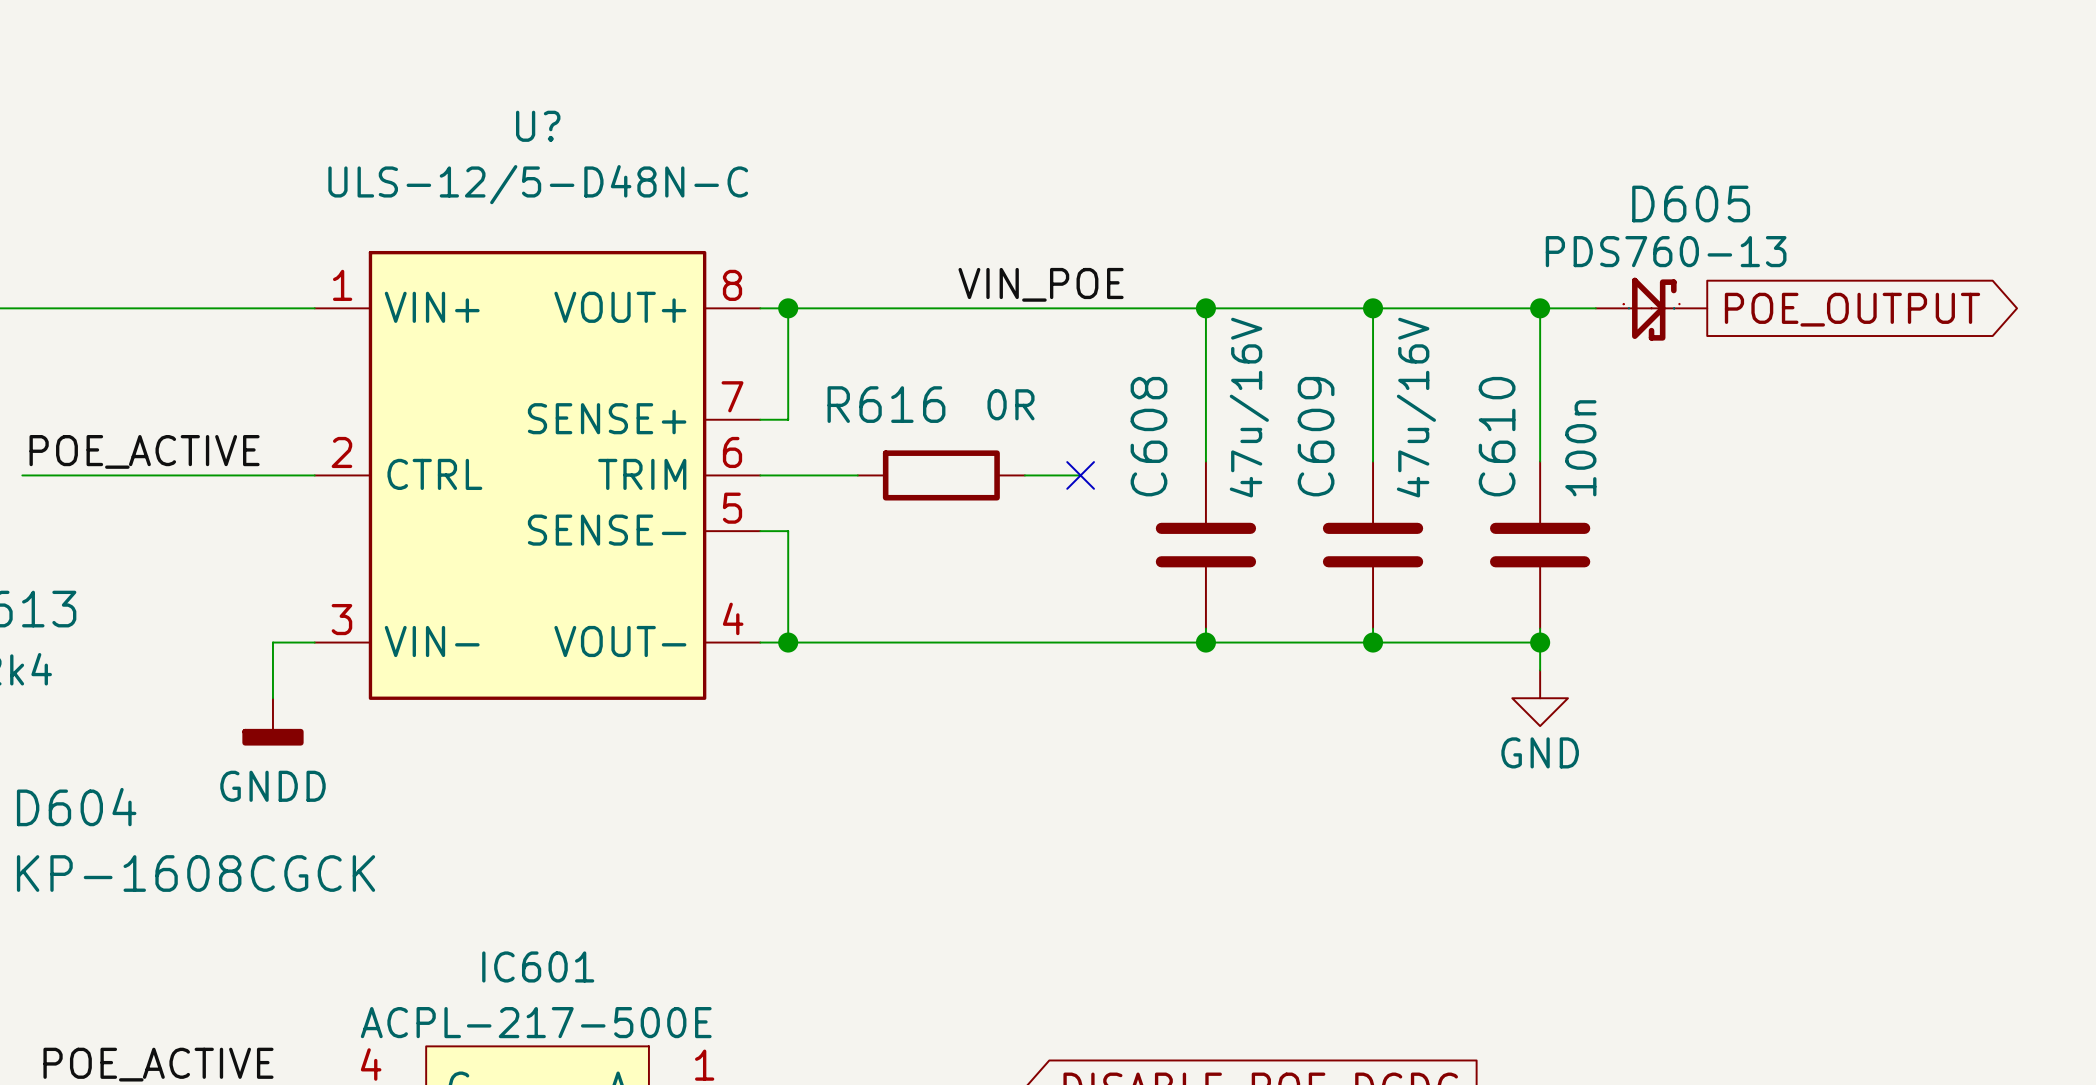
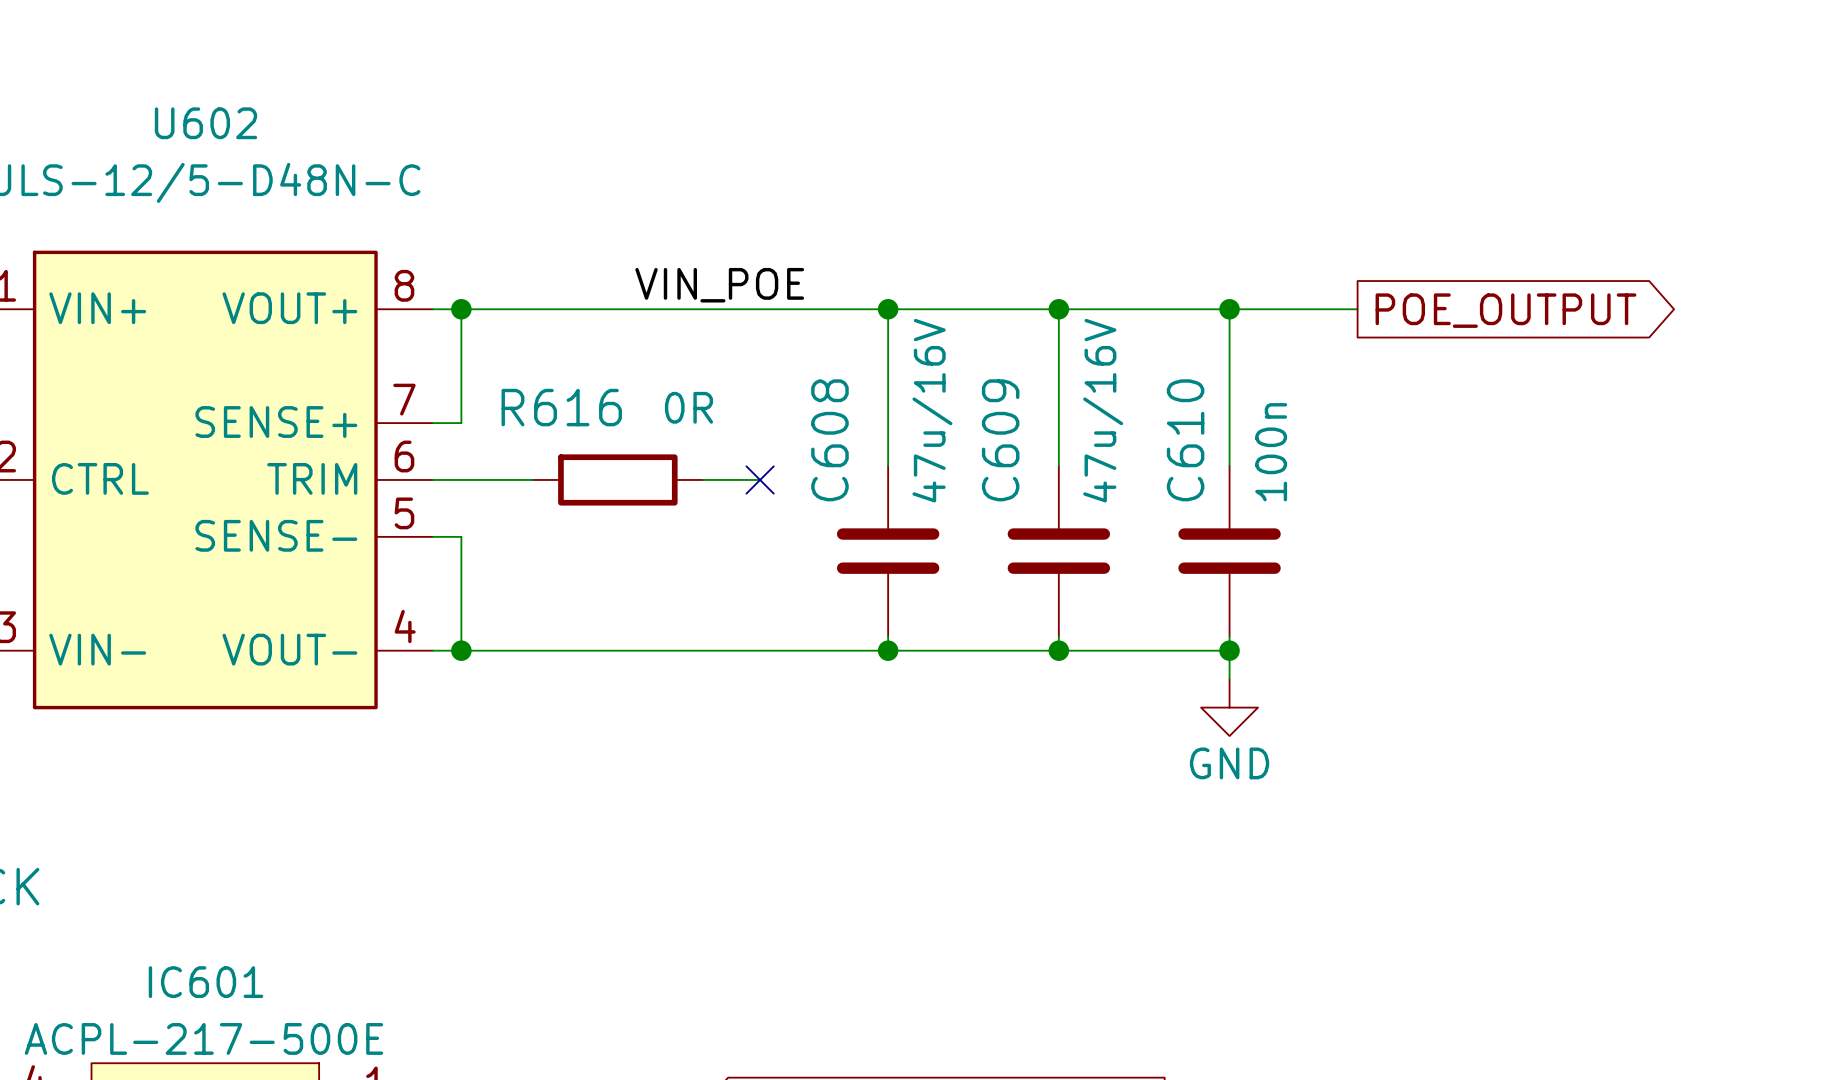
U? name: U? (538, 126) -> U602 (205, 123)
D605: (1651, 309) -> none
global label position: POE_OUTPUT (1852, 309) -> POE_OUTPUT (1505, 310)

